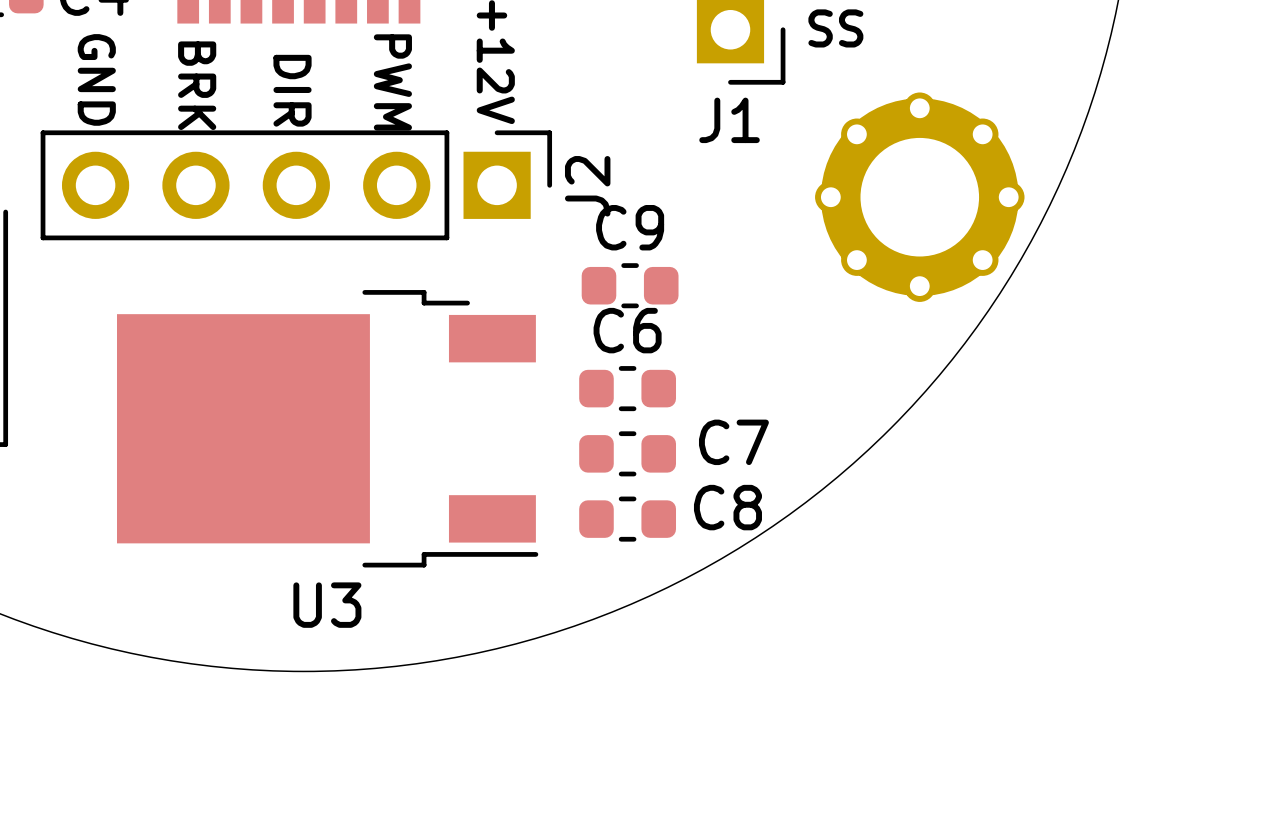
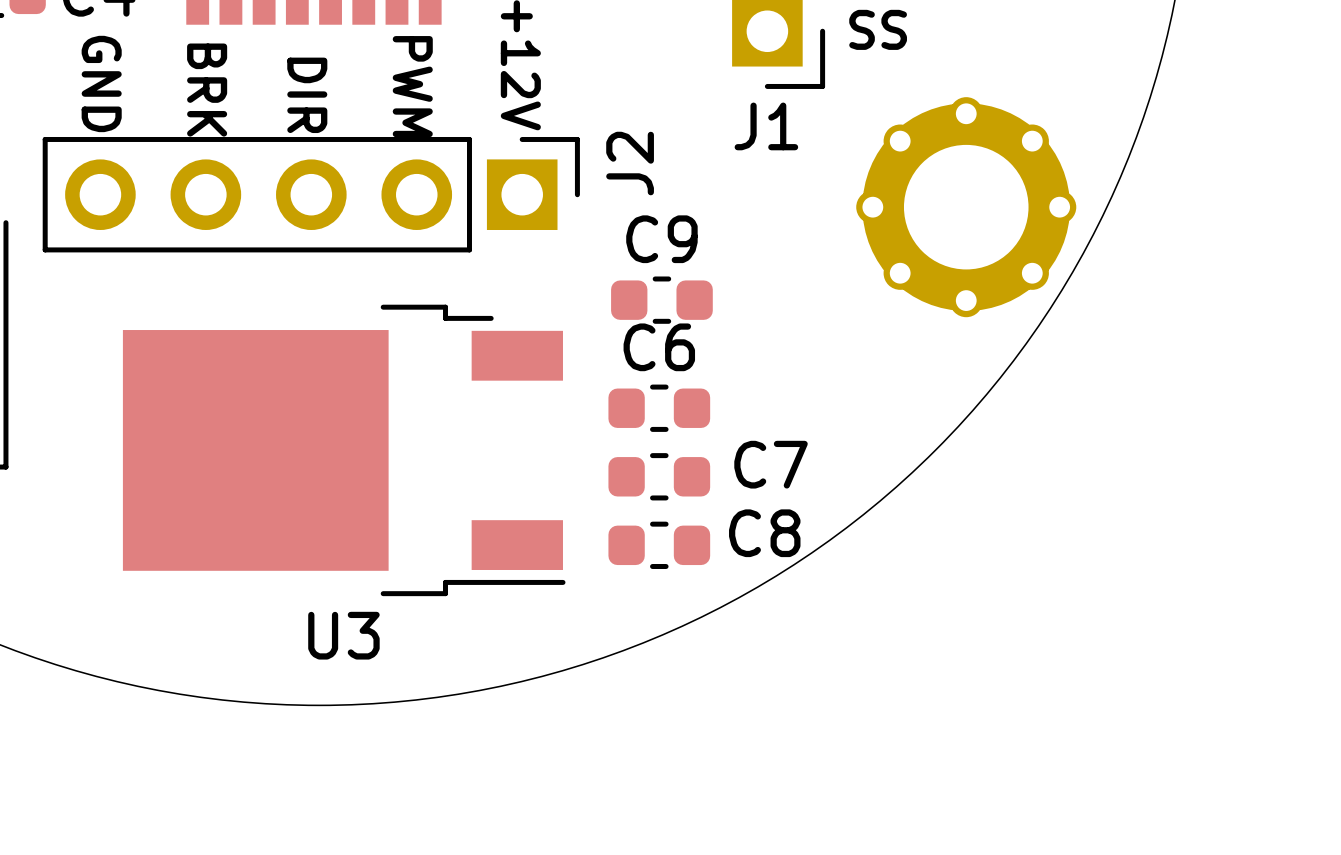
J2 name position: J2 (587, 186) -> J2 (630, 163)

